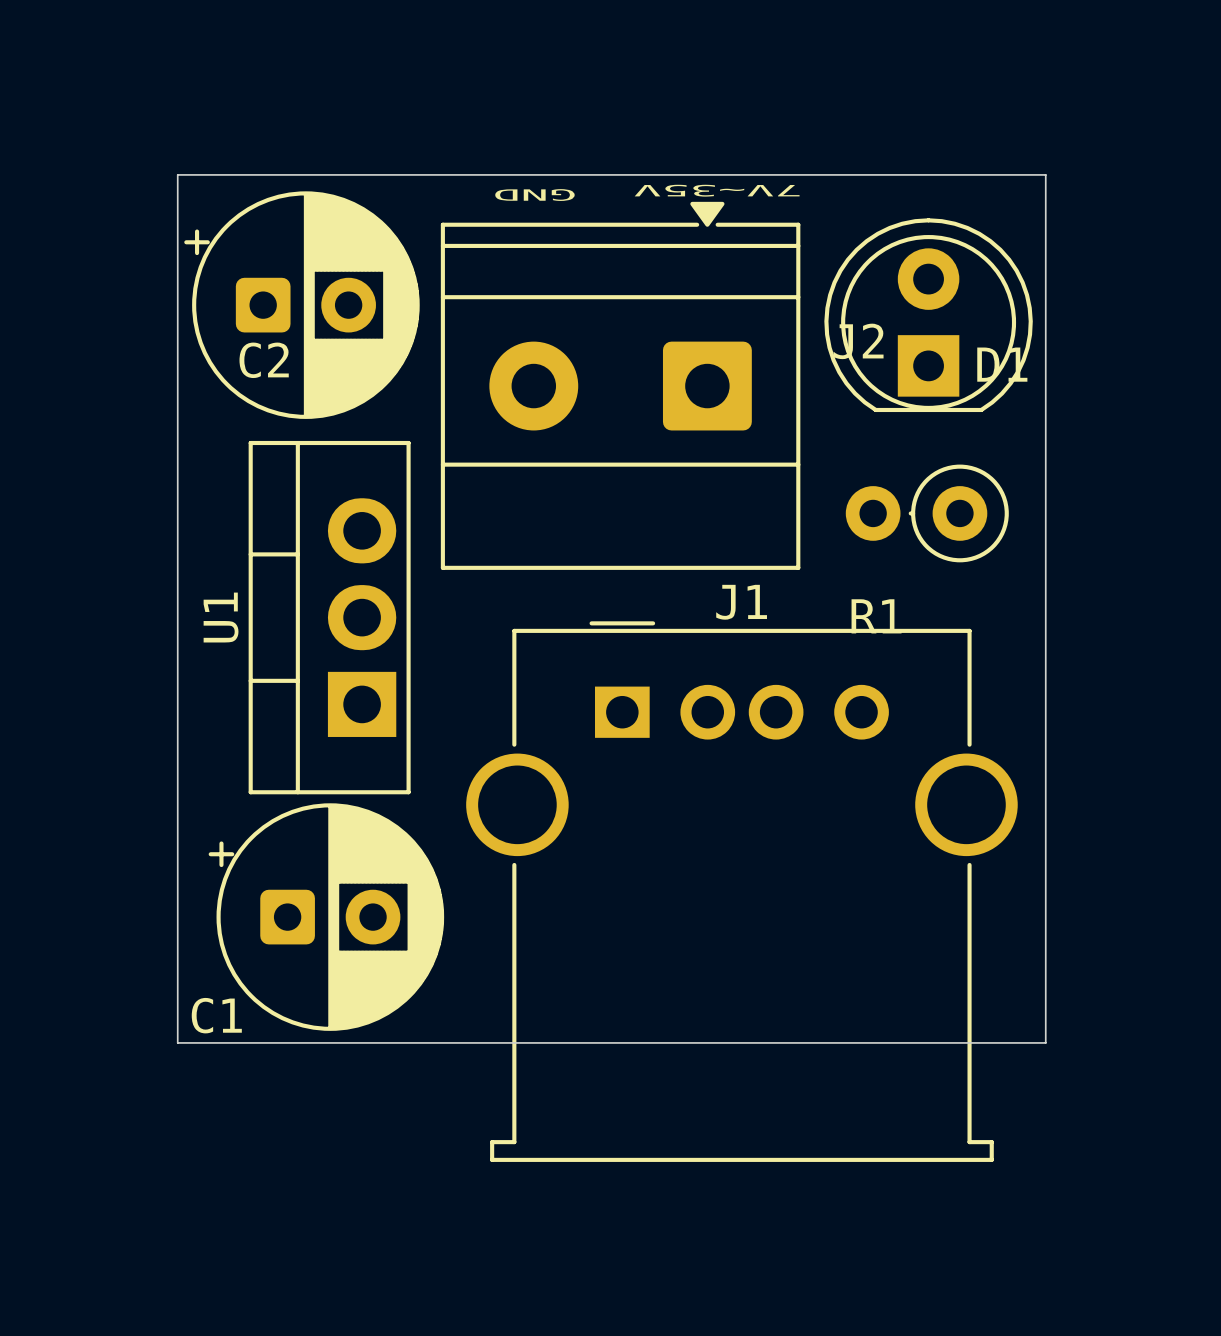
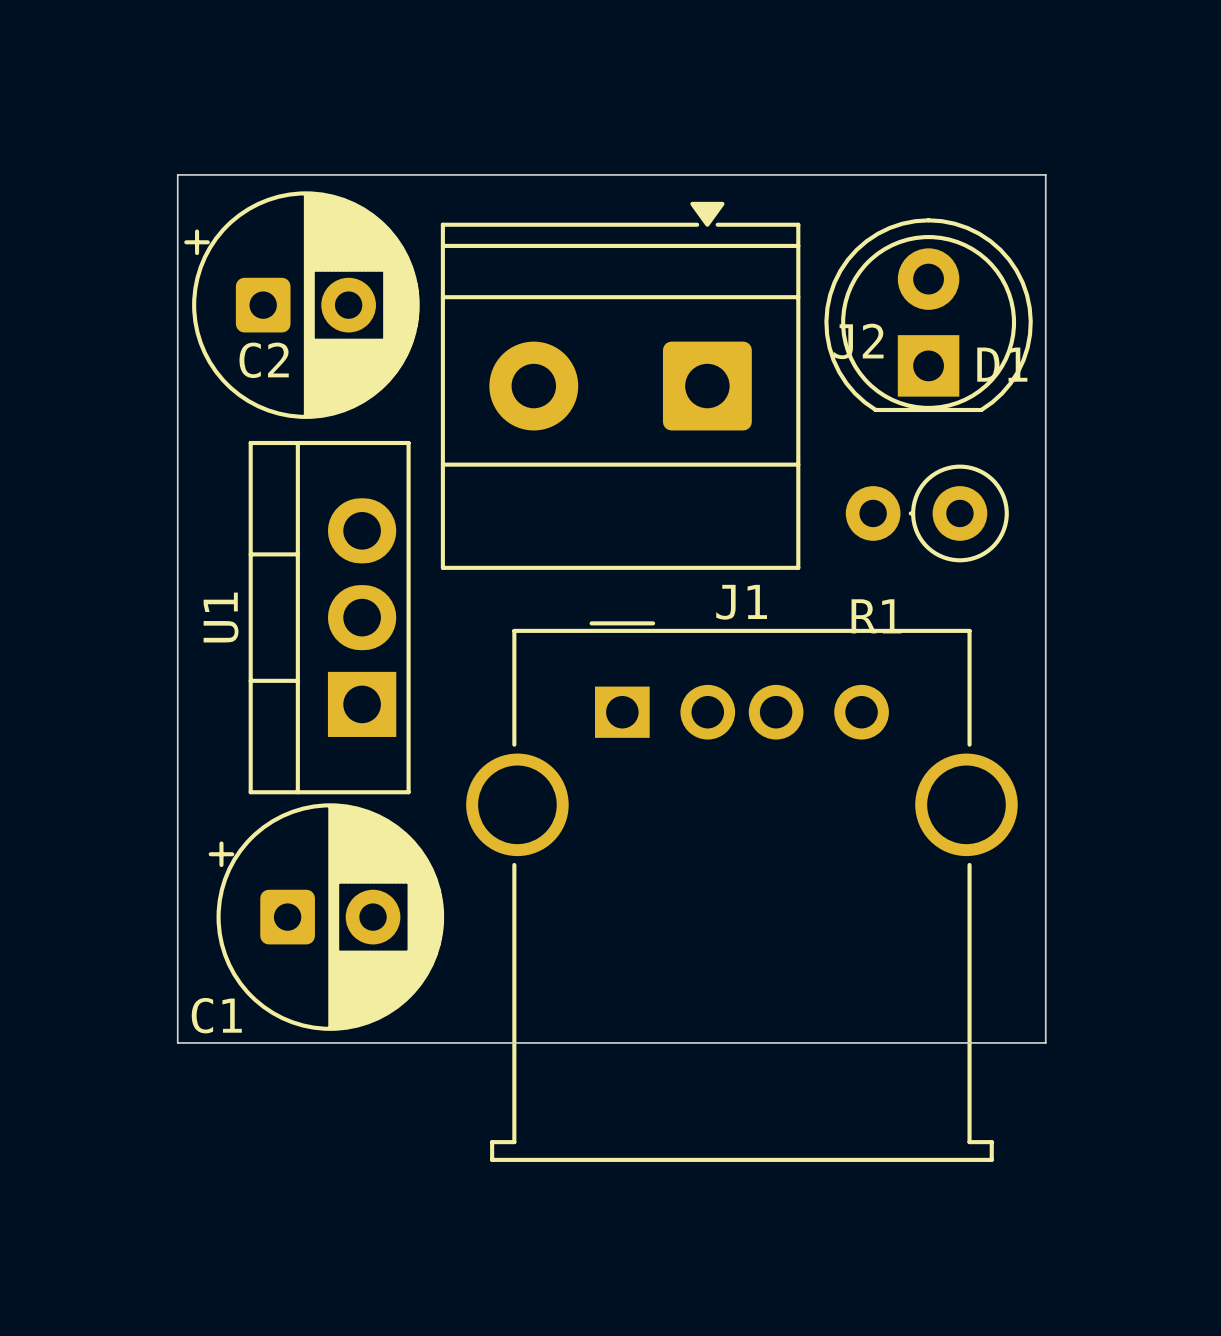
text: 7V~35V (717, 190) -> none
text: GND (534, 195) -> none

